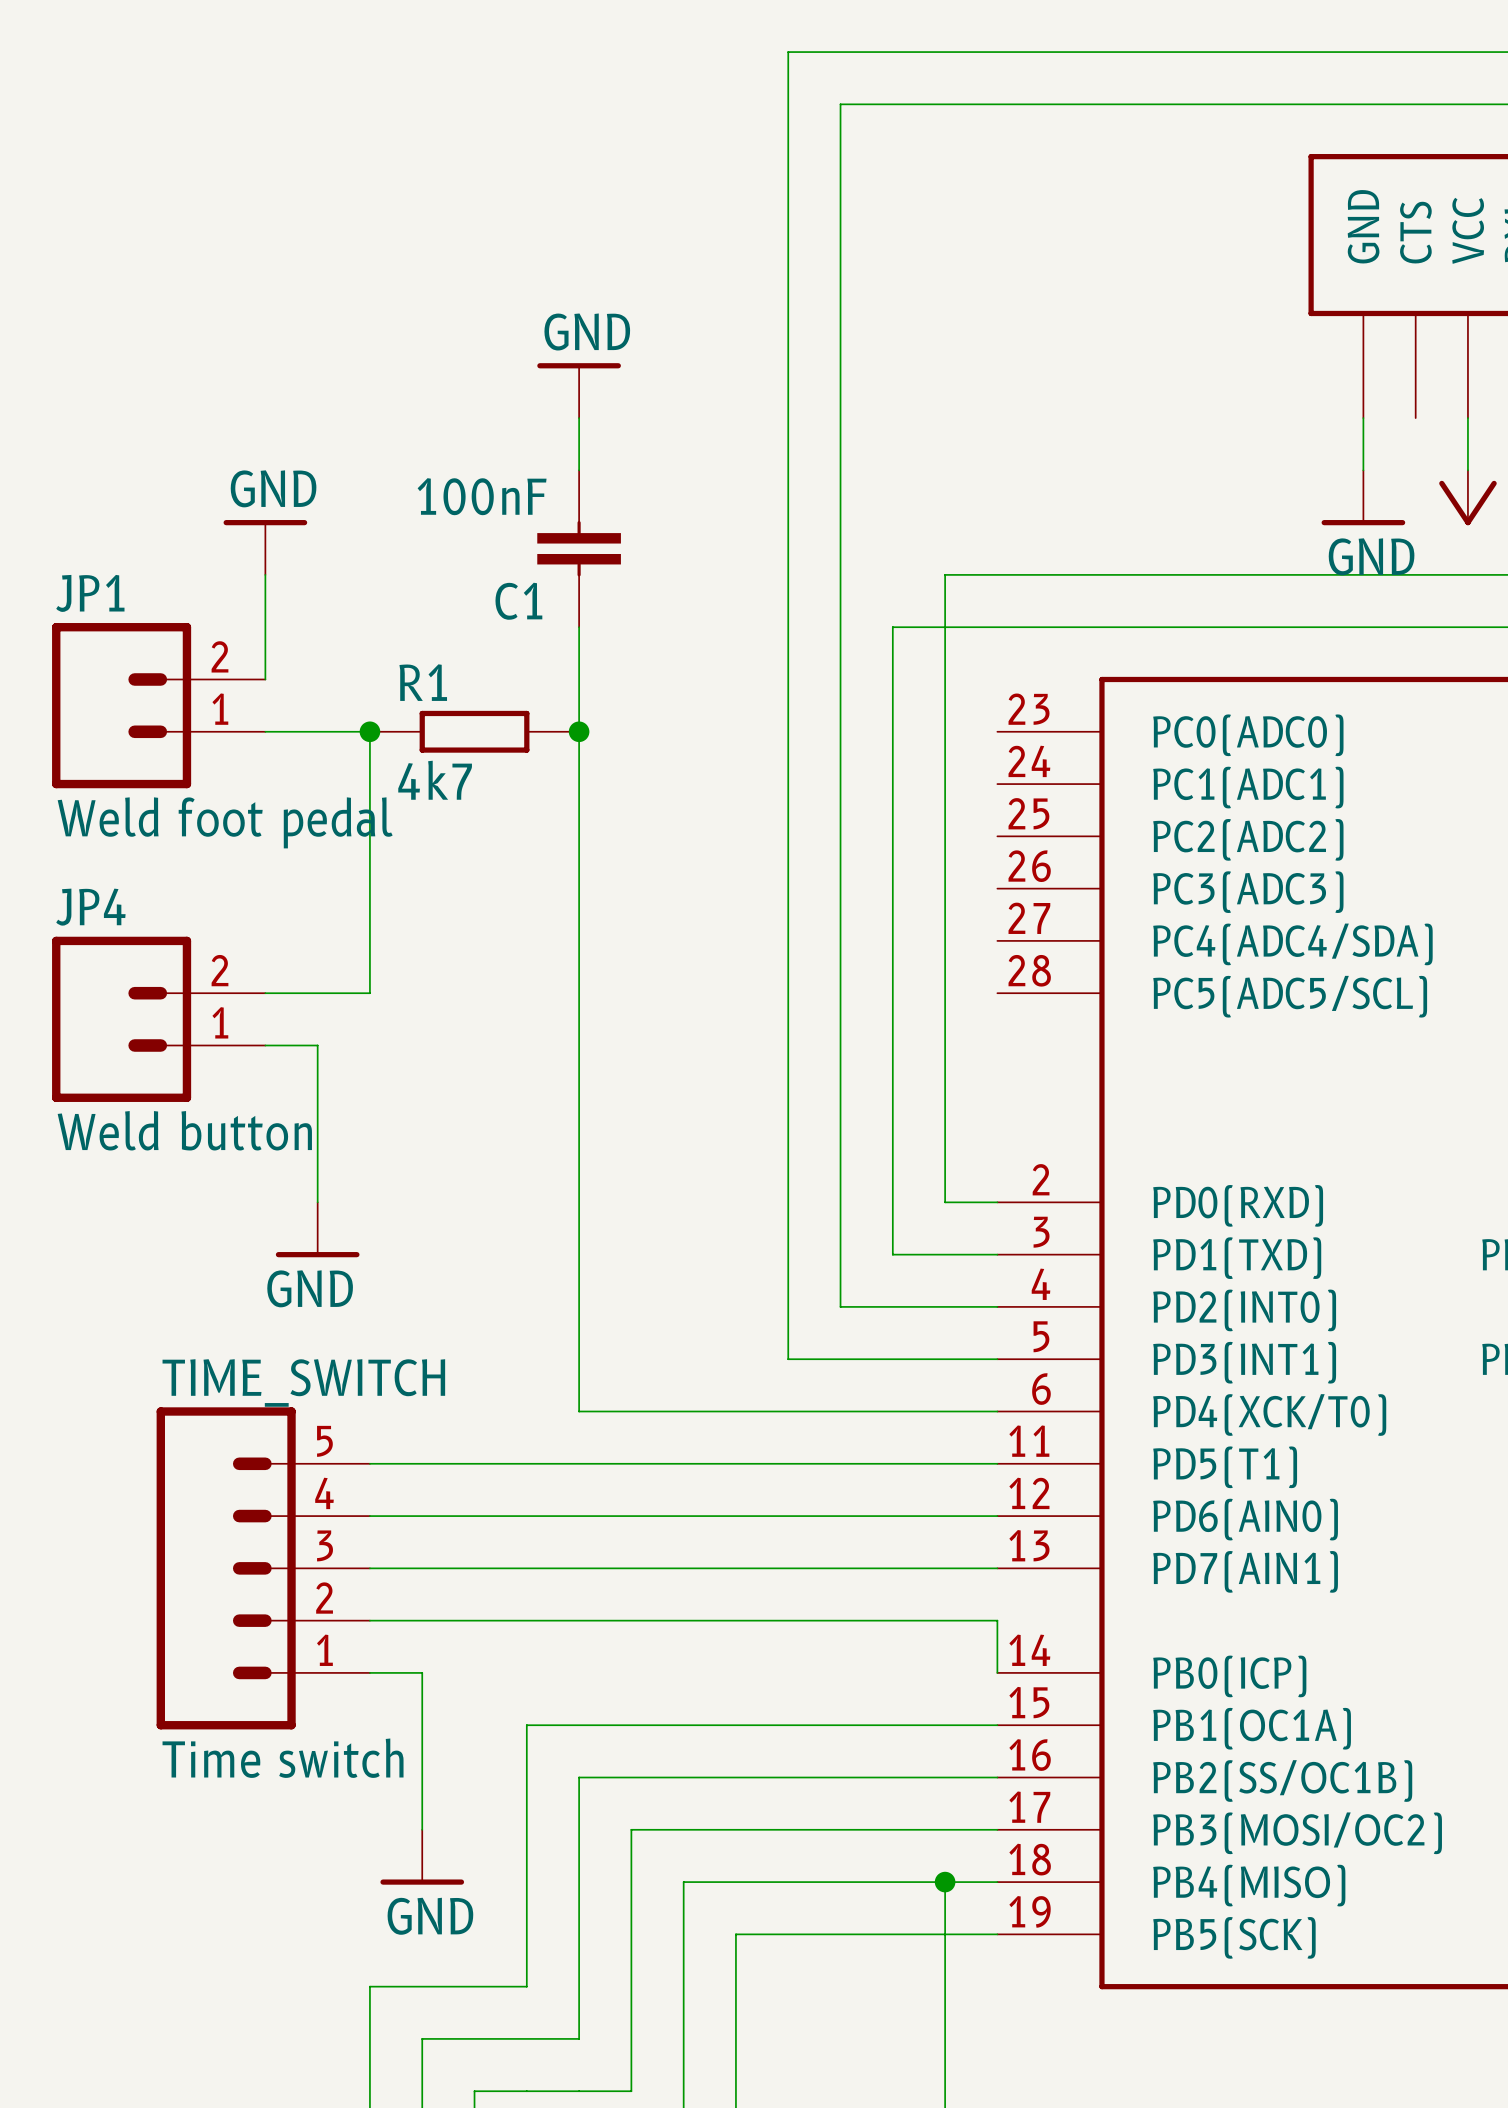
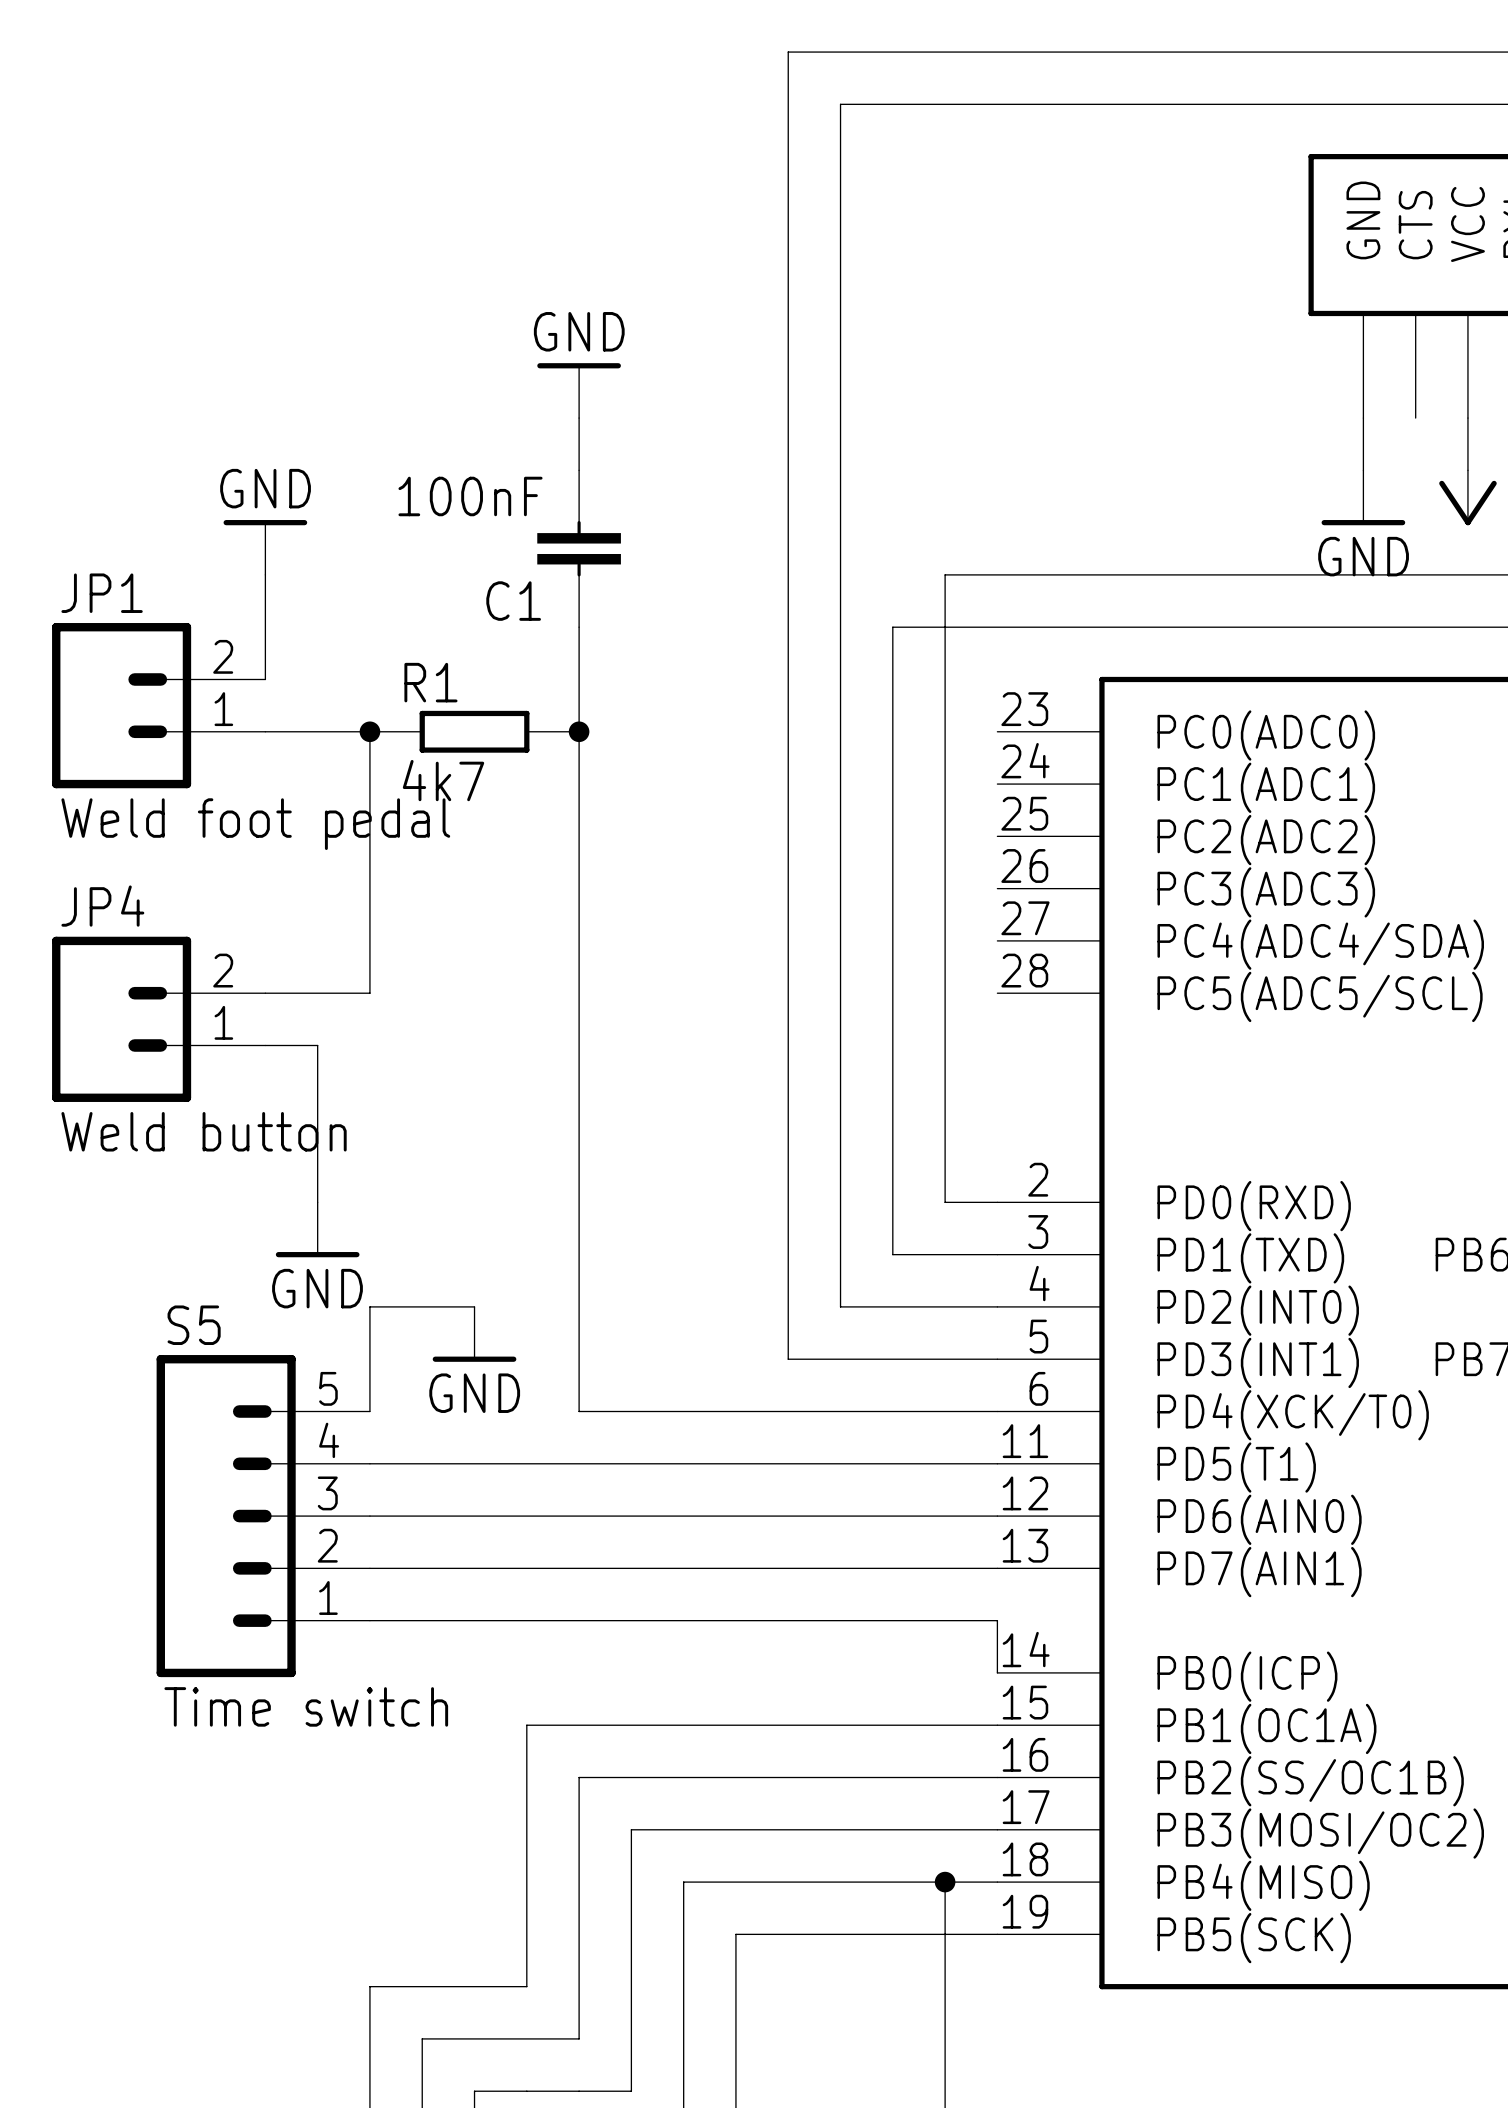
wire: none -> (474, 1306) (369, 1306) (369, 1411)
power symbol: none -> GND (474, 1334)
S5: none -> Time switch (263, 1516)
TIME_SWITCH: Time switch (263, 1568) -> none
wire: (369, 1672) (422, 1672) (422, 1829) -> none
power symbol: GND (422, 1857) -> none

